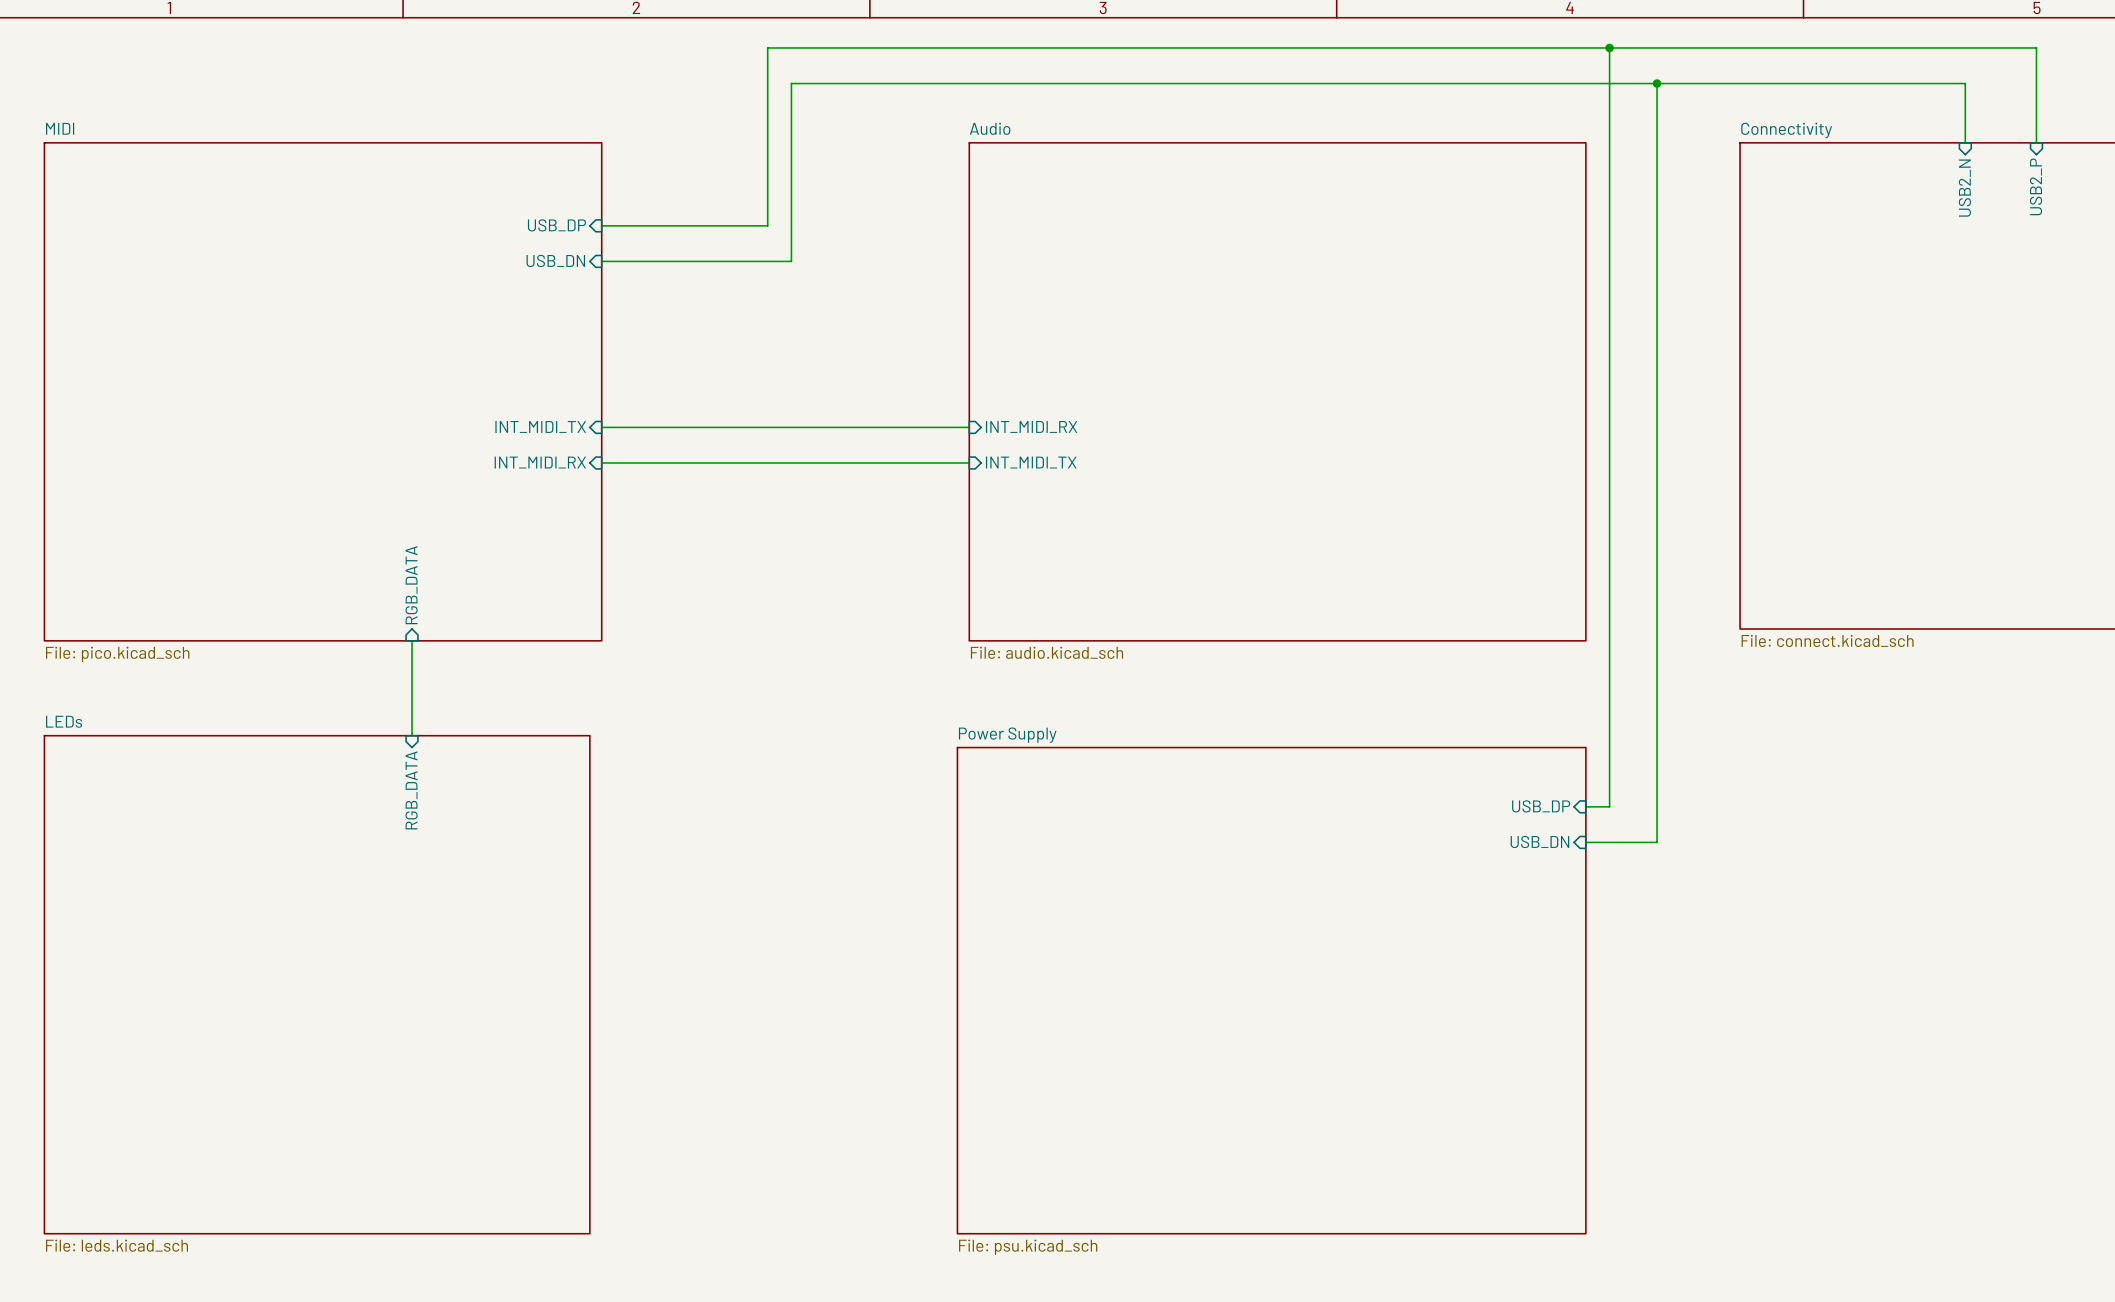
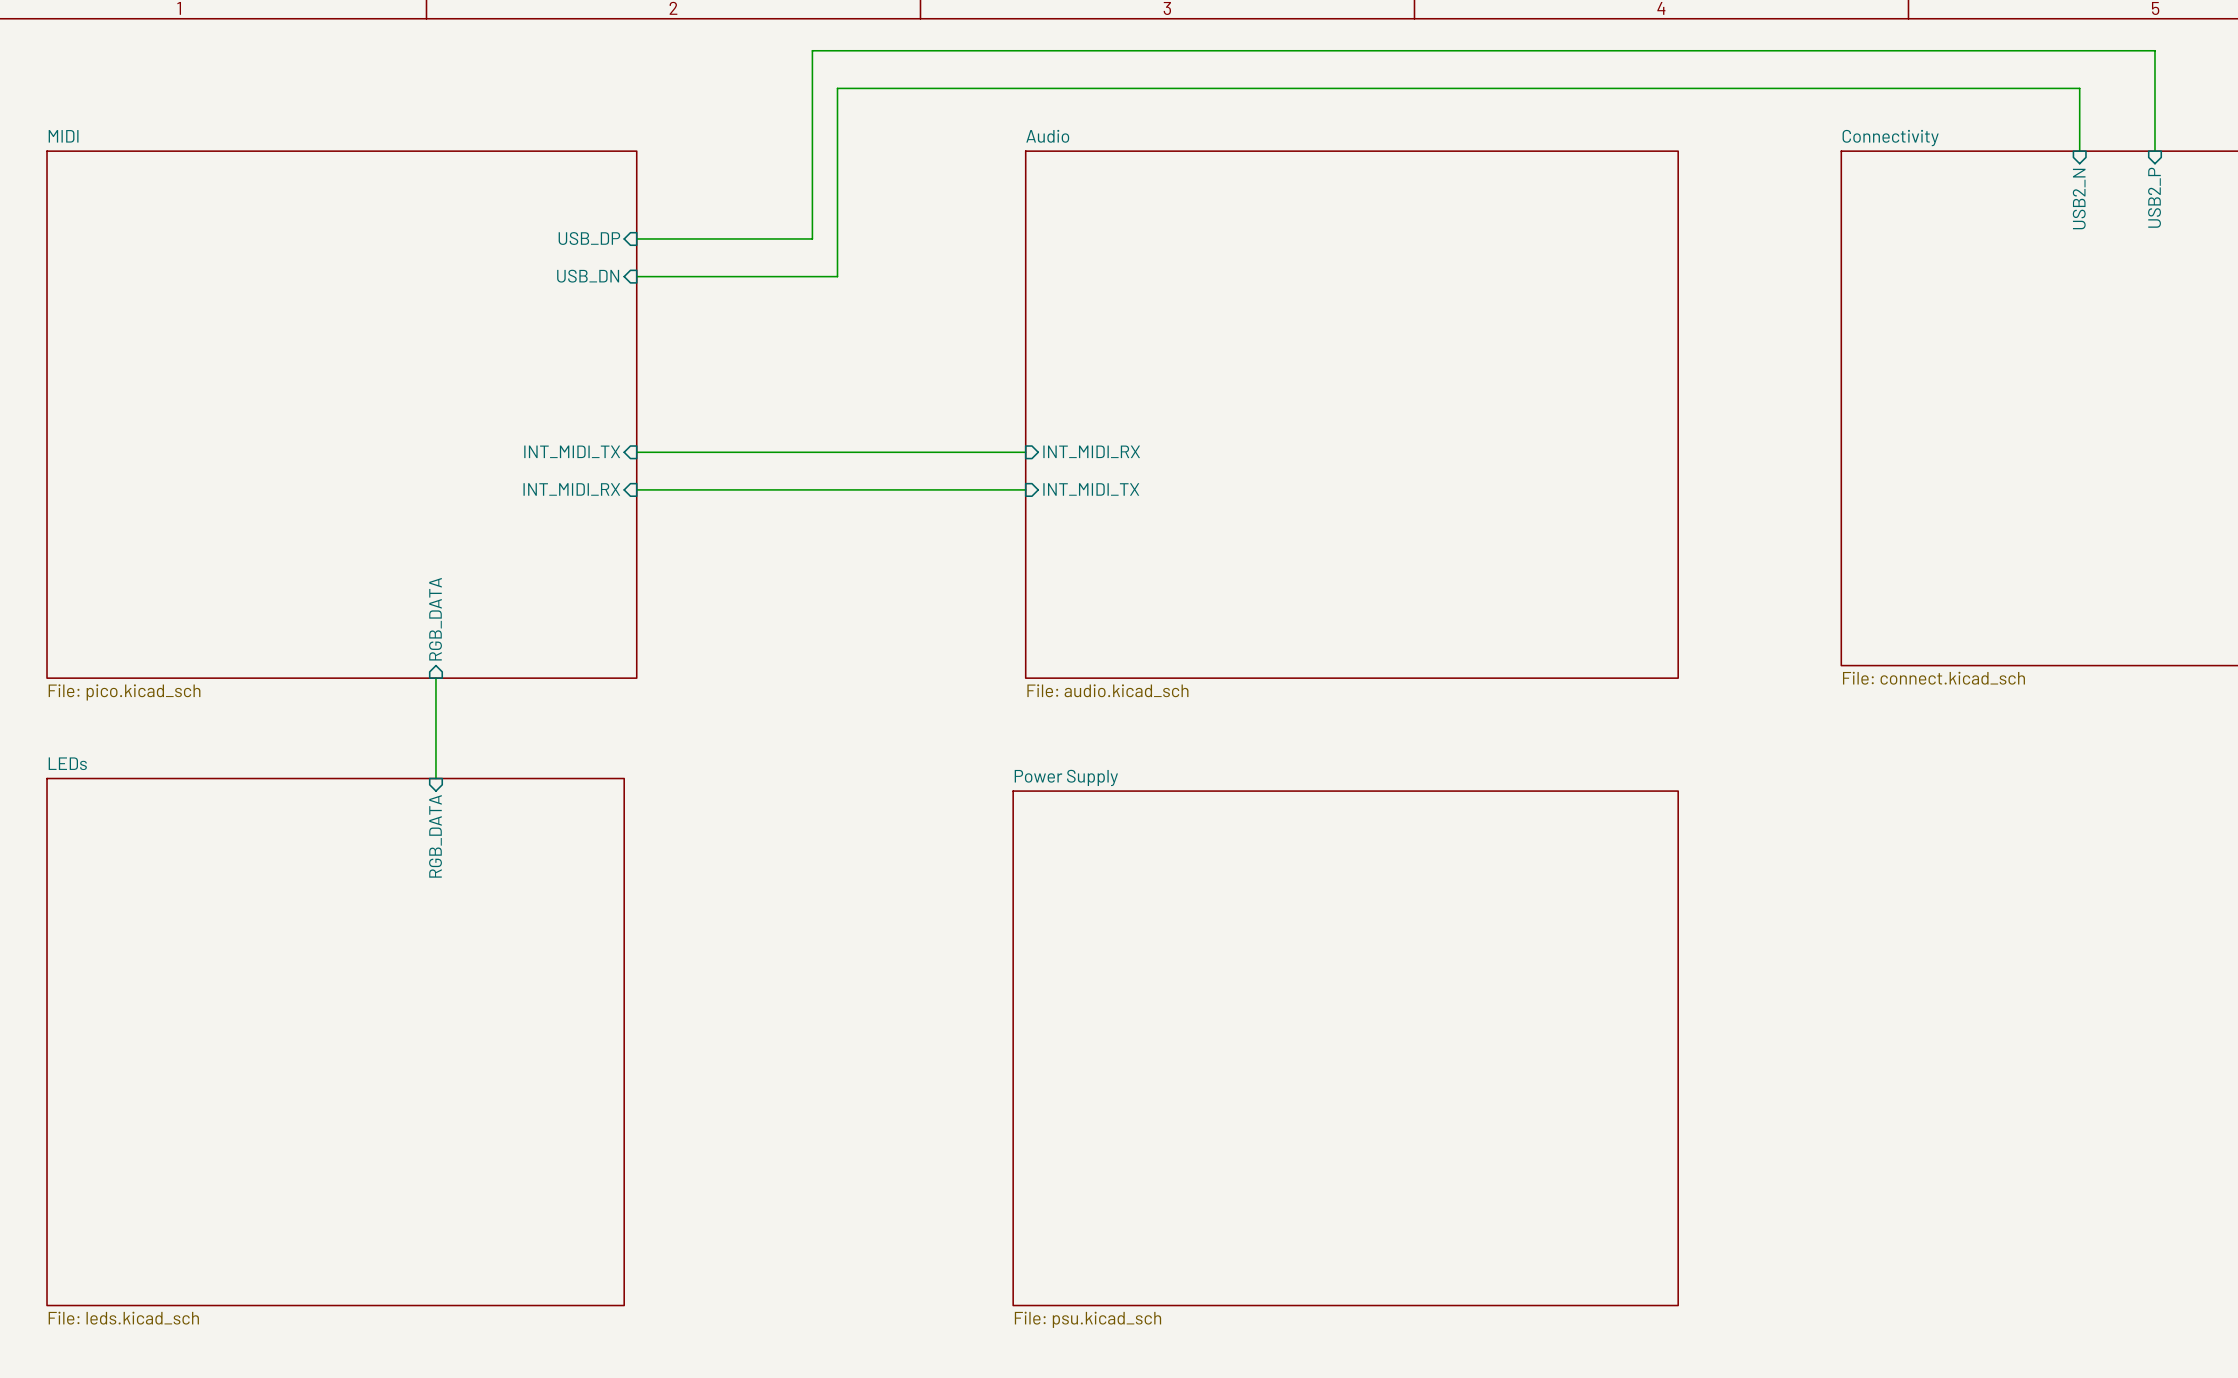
wire: (1609, 47) (1609, 806) (1585, 806) -> none
junction: (1609, 47) -> none
wire: (1657, 83) (1657, 842) (1585, 842) -> none
junction: (1657, 83) -> none
sheet pin: USB_DP (1541, 806) -> none
sheet pin: USB_DN (1539, 841) -> none

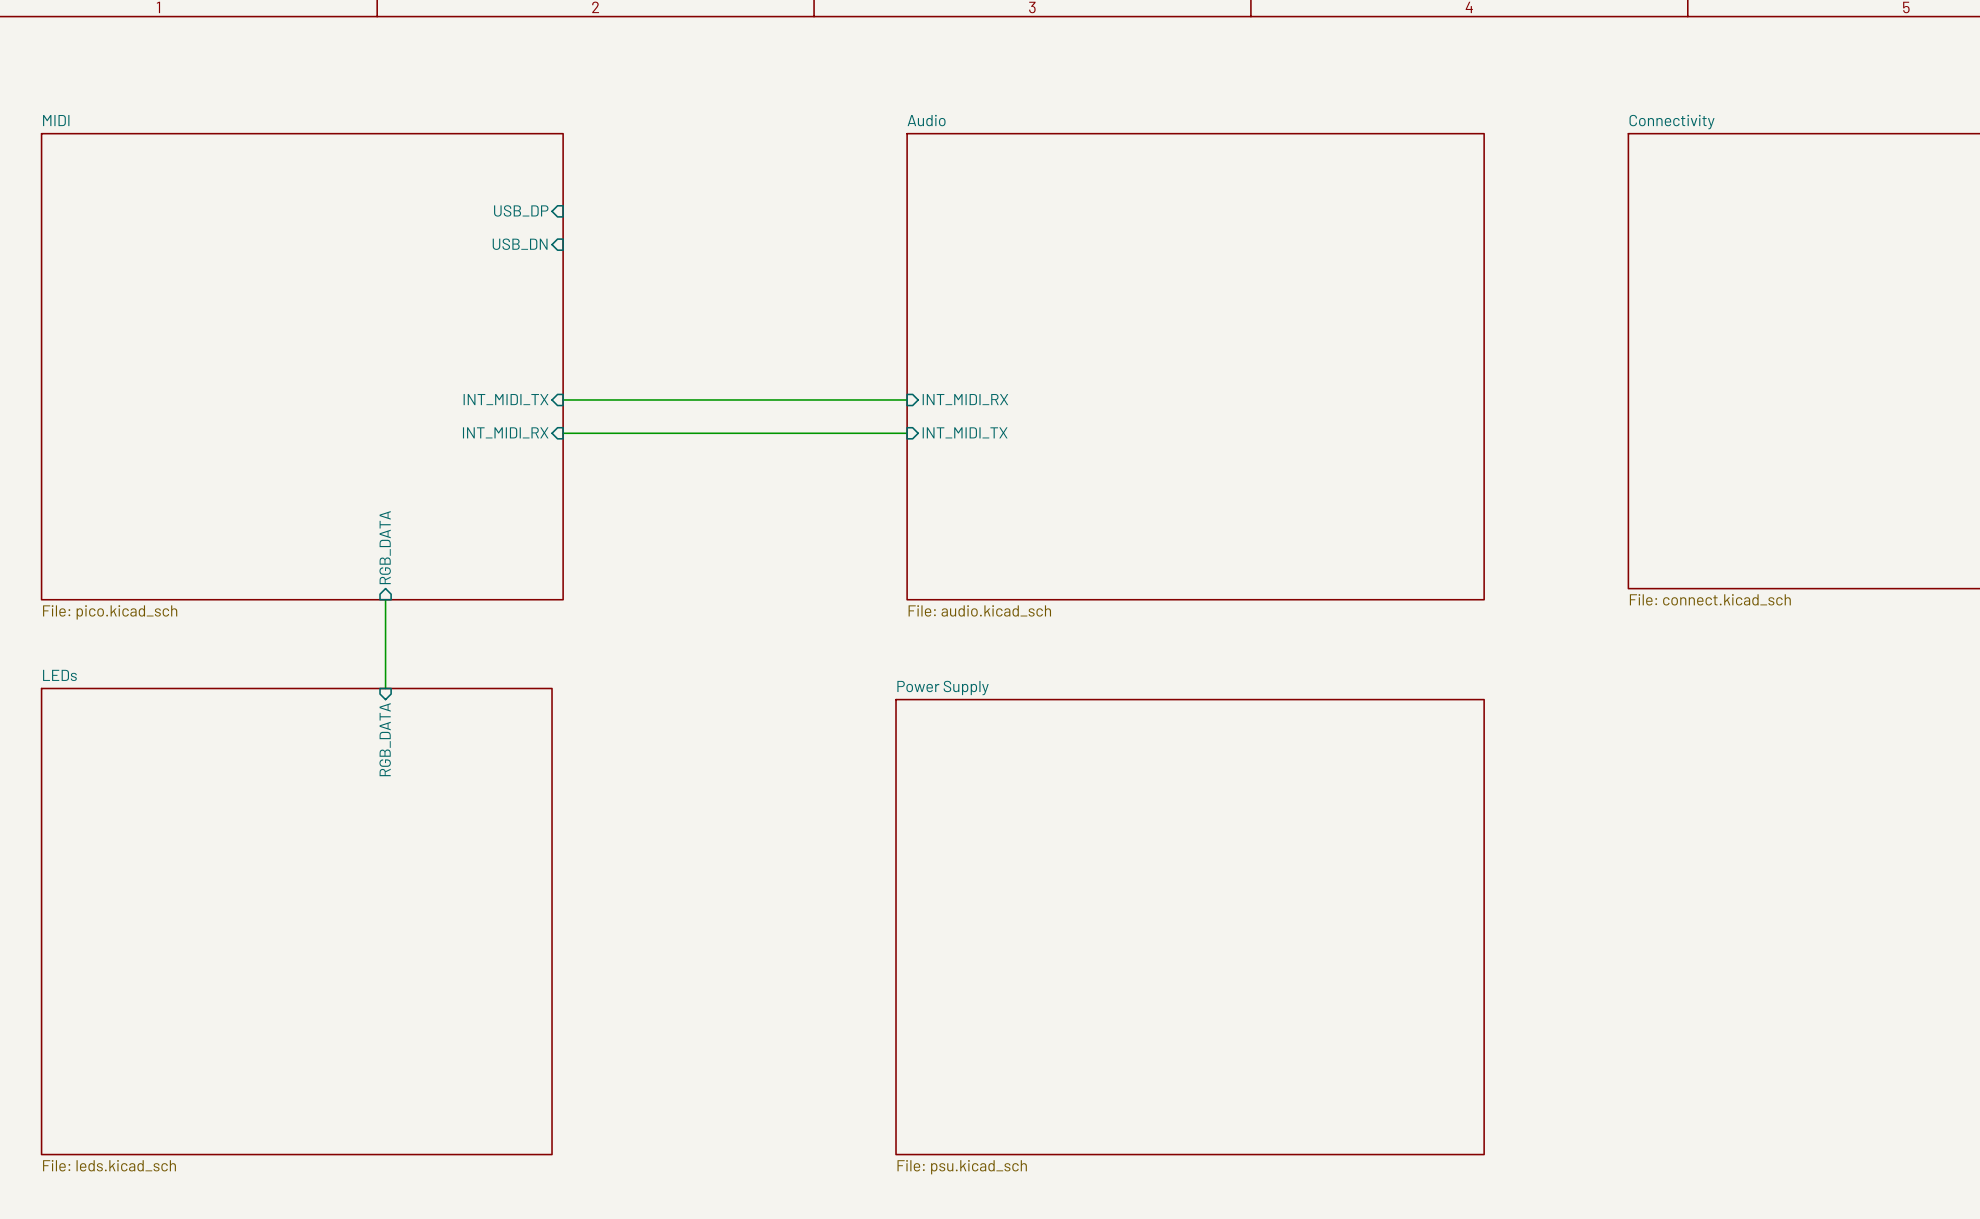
wire: (2079, 151) (2079, 88) (837, 88) (837, 276) (636, 276) -> none
wire: (2154, 151) (2154, 50) (812, 50) (812, 238) (636, 238) -> none
sheet pin: USB2_P (2154, 197) -> none
sheet pin: USB2_N (2079, 199) -> none

